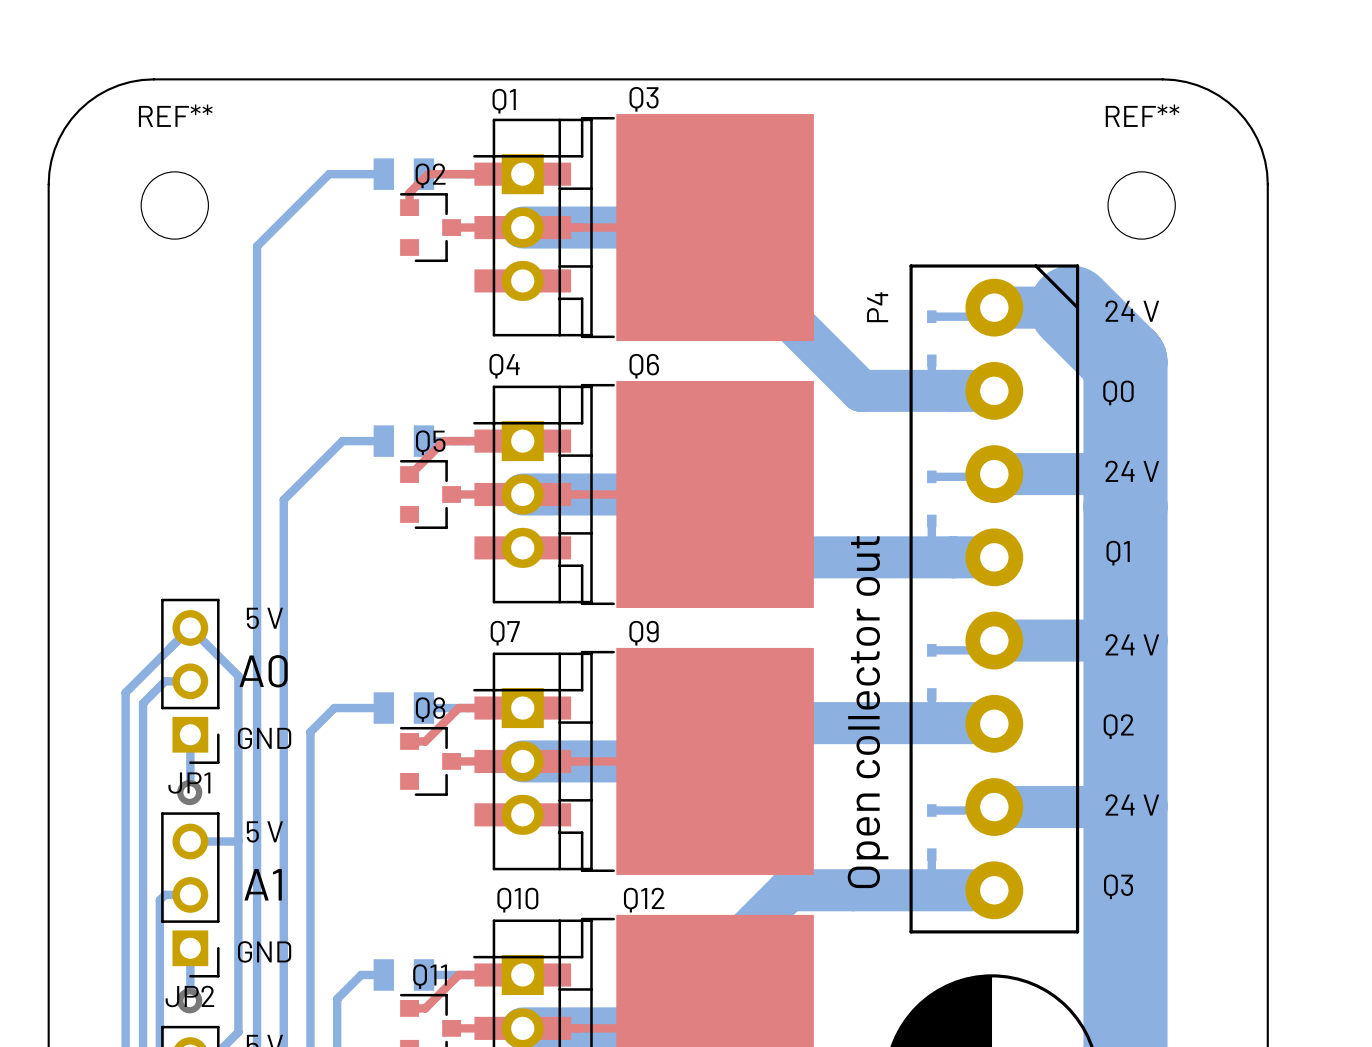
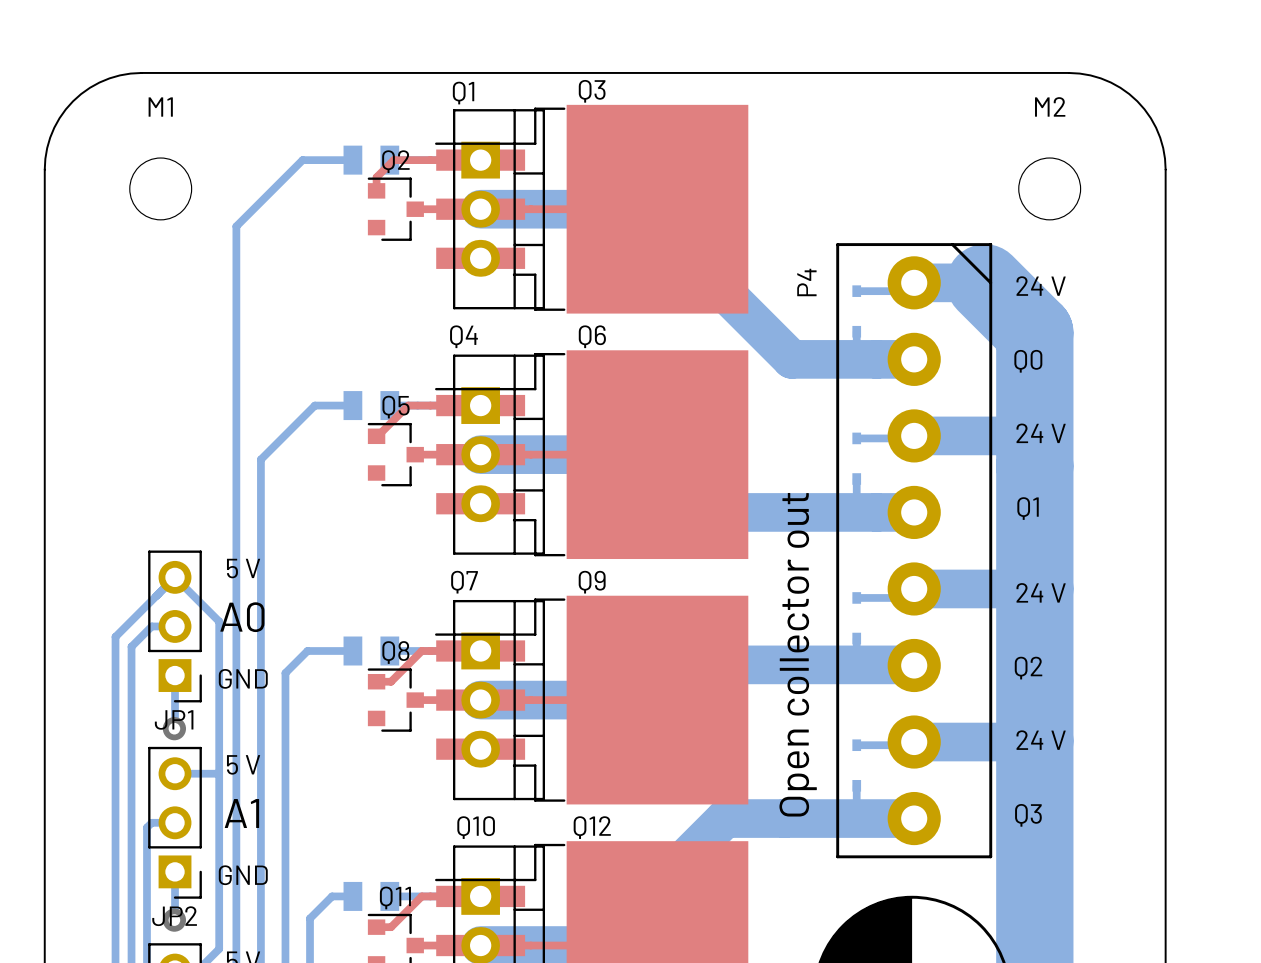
REF** name: REF** (175, 115) -> M1 (160, 107)
REF** name: REF** (1142, 115) -> M2 (1050, 106)

